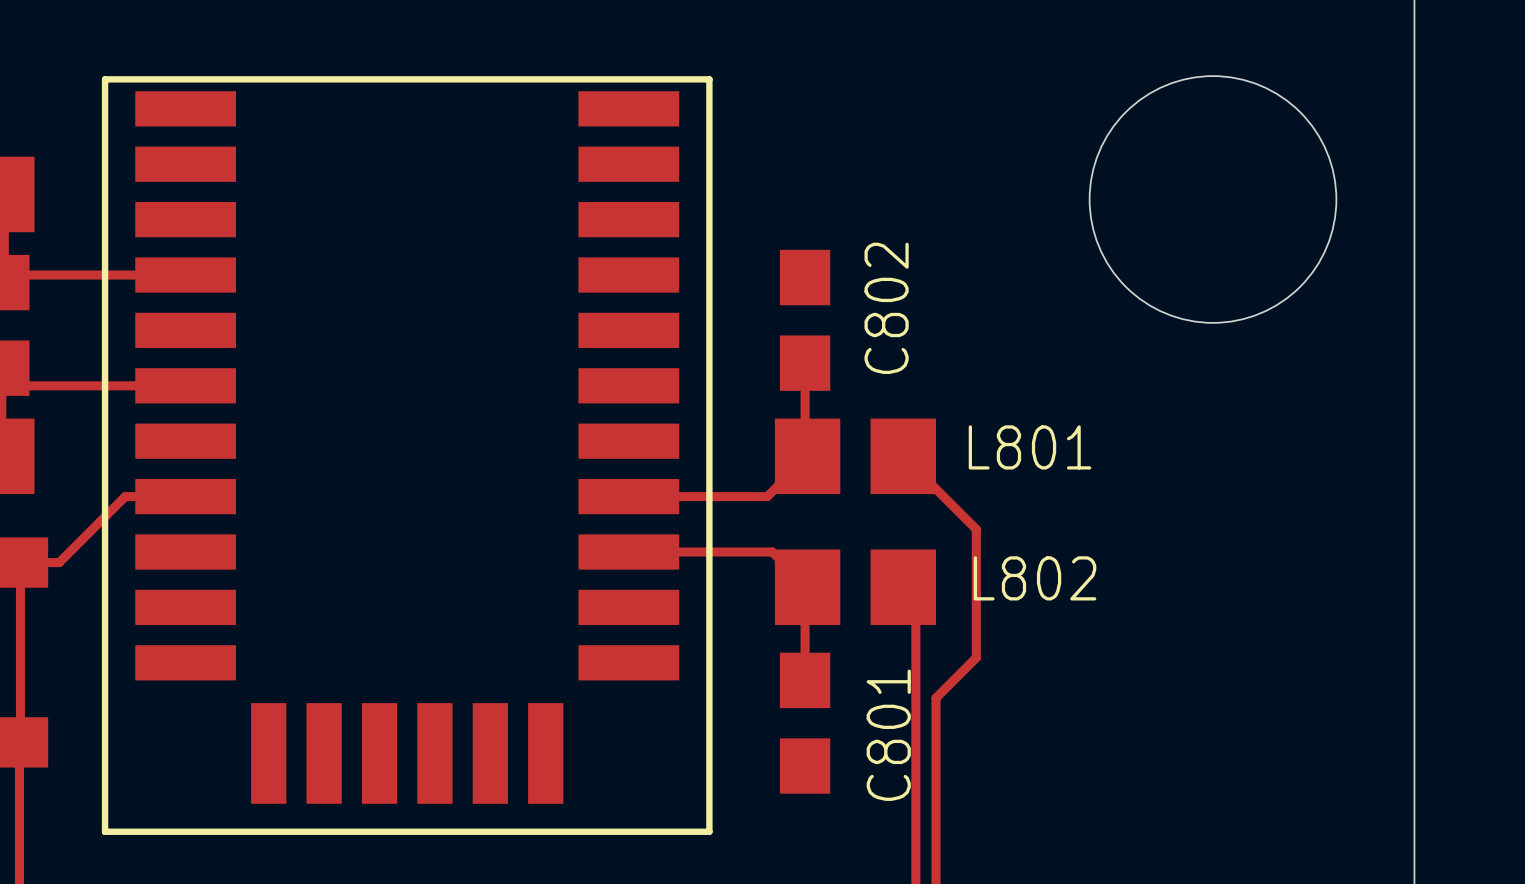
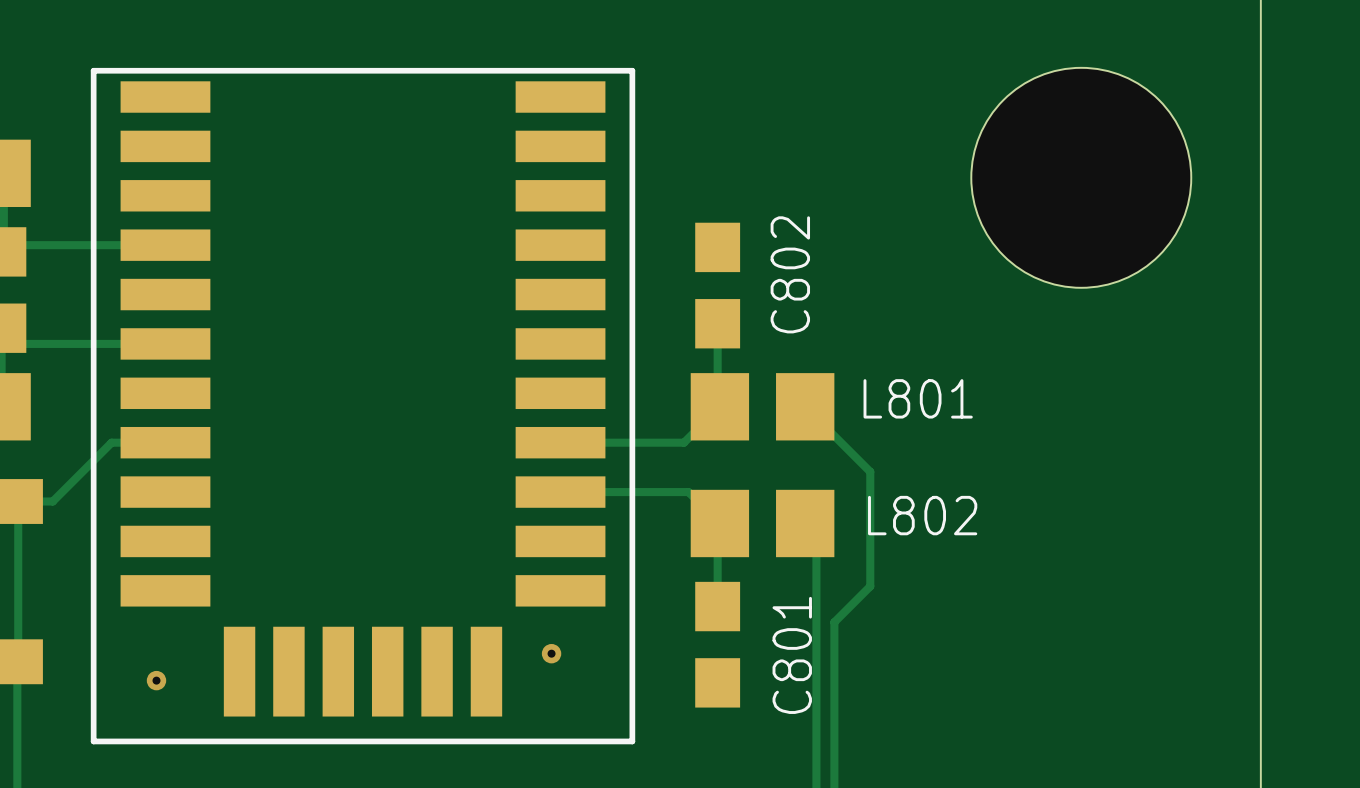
via: none -> (551, 653)
via: none -> (156, 680)

